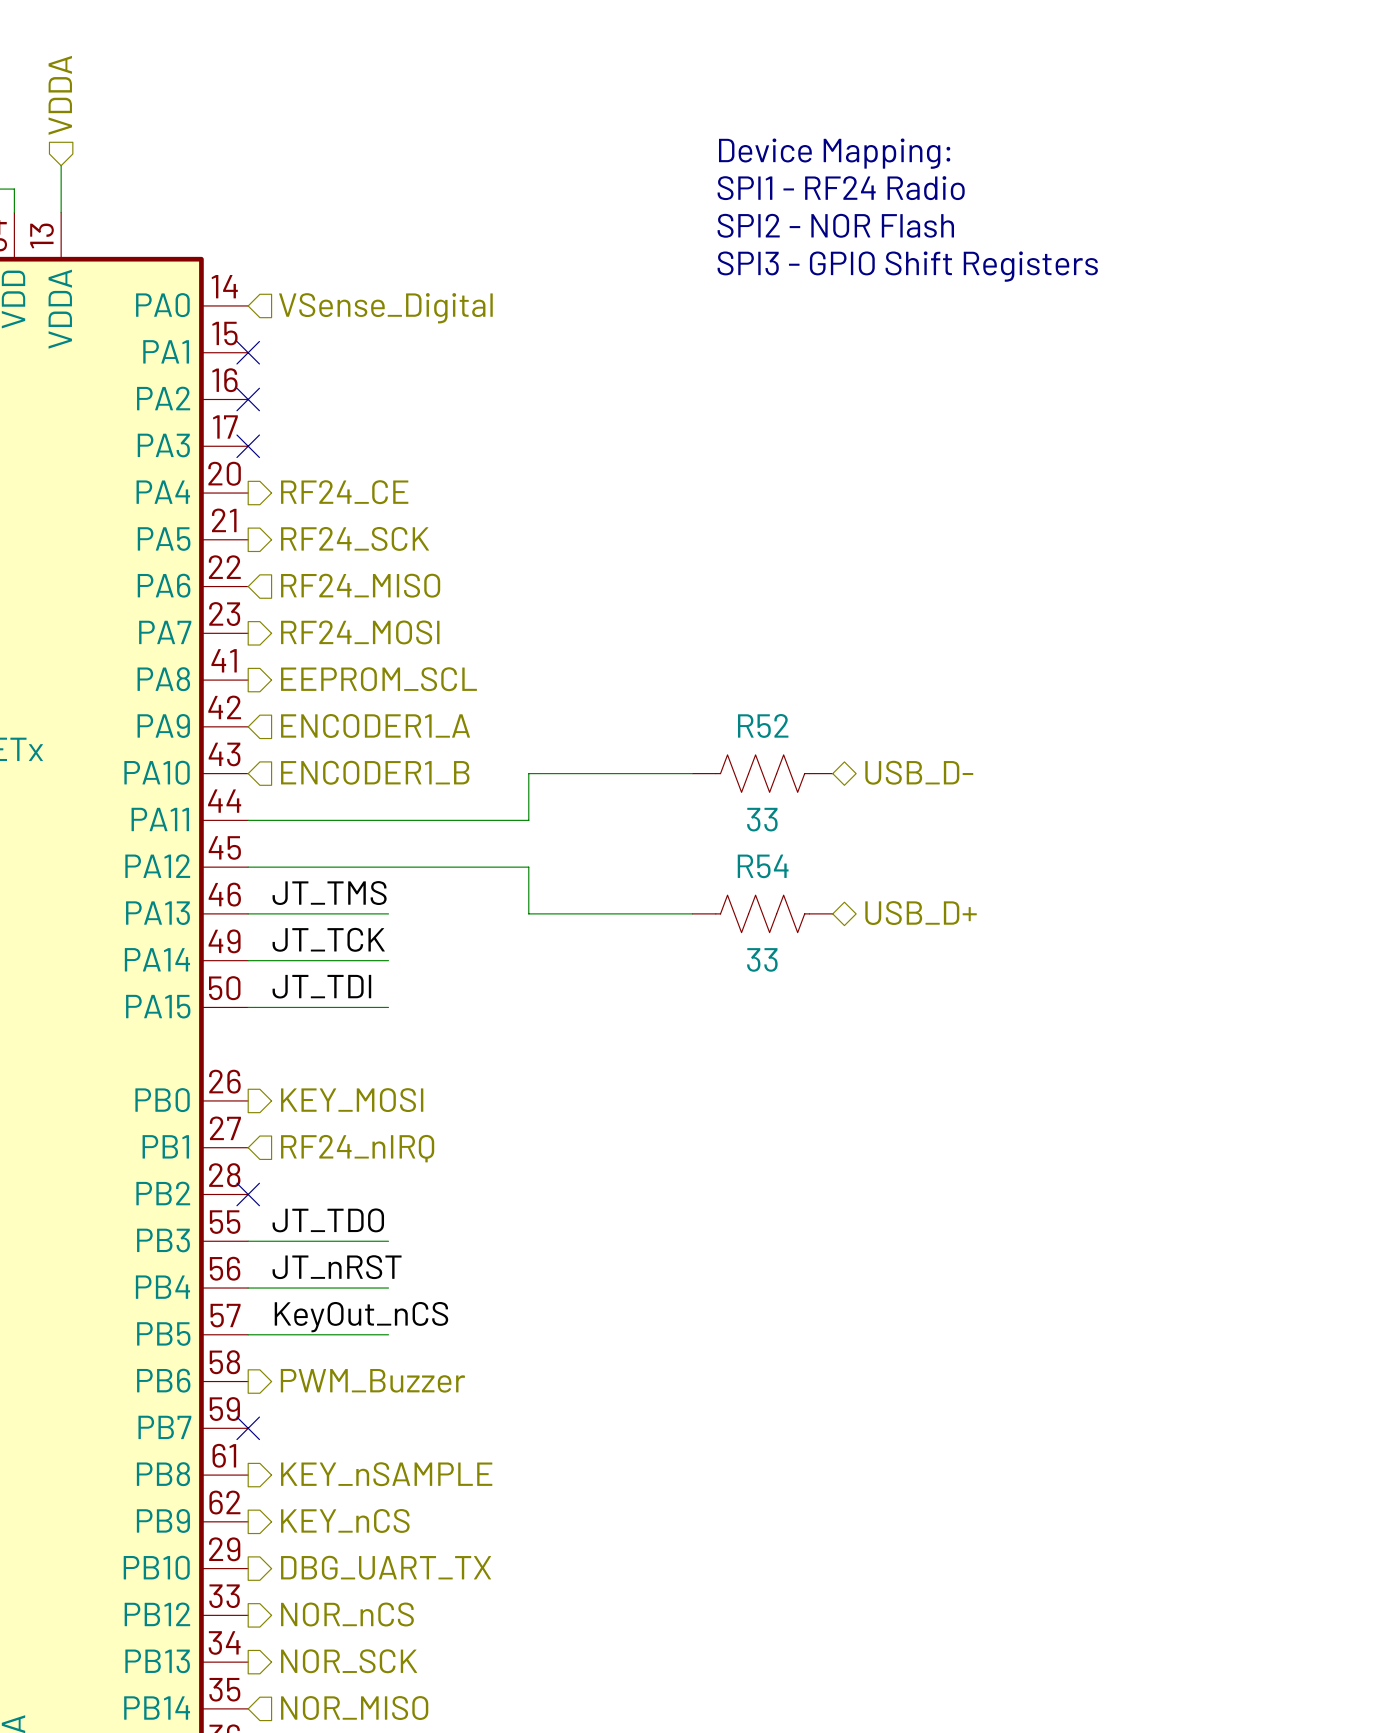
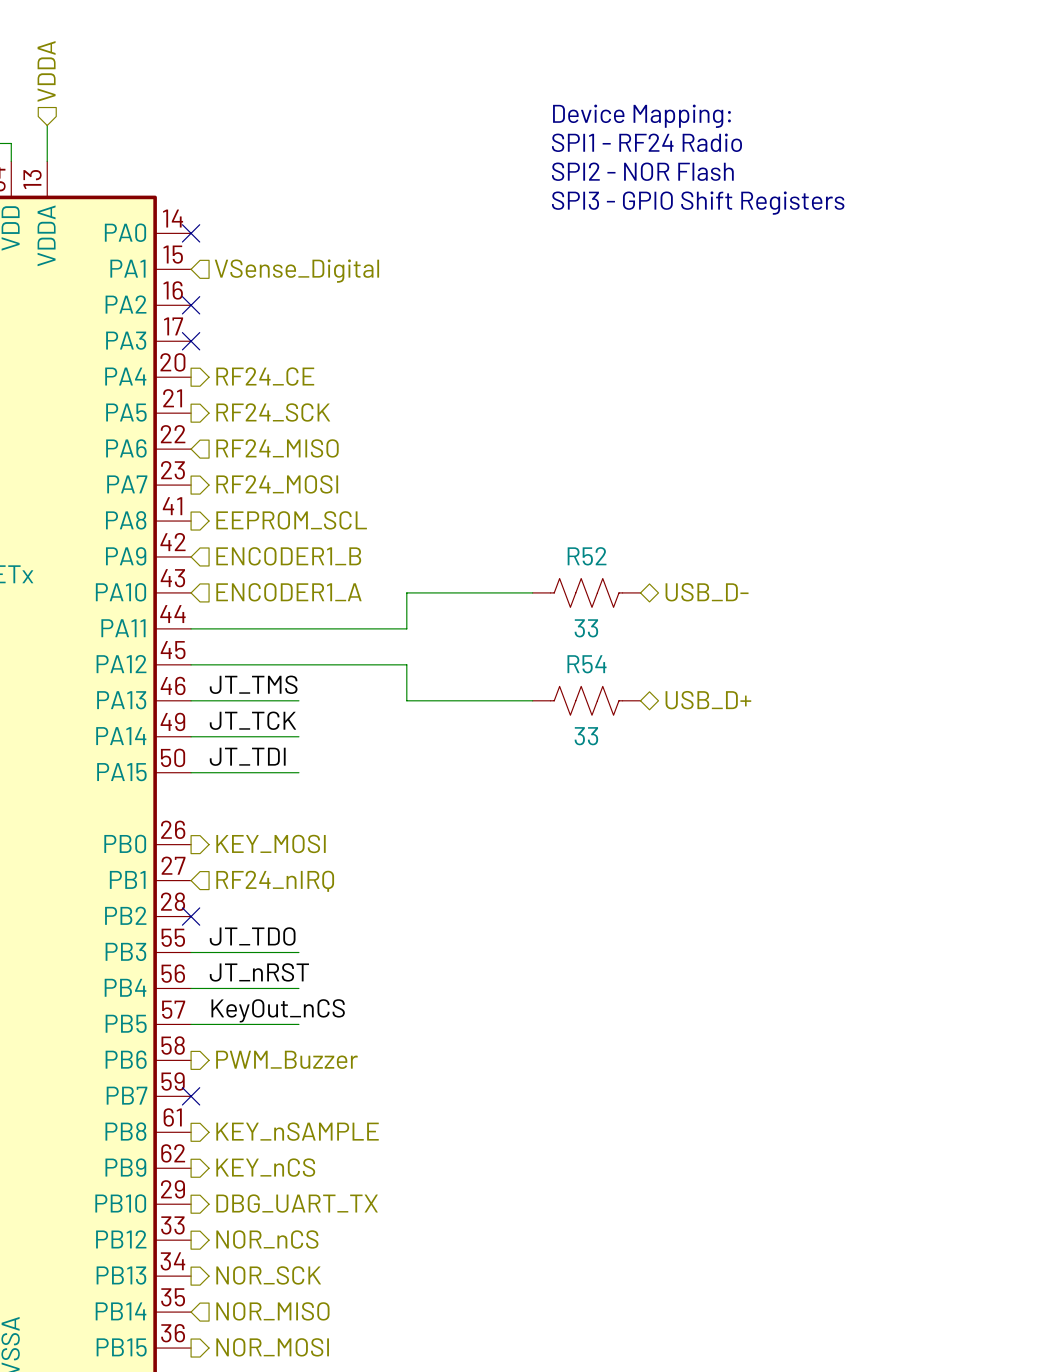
hierarchical label position: VSense_Digital (385, 308) -> VSense_Digital (296, 271)
no-connect mark position: (248, 352) -> (191, 233)
hierarchical label: ENCODER1_A (375, 725) -> ENCODER1_B (288, 556)
hierarchical label: ENCODER1_B (375, 772) -> ENCODER1_A (288, 592)

